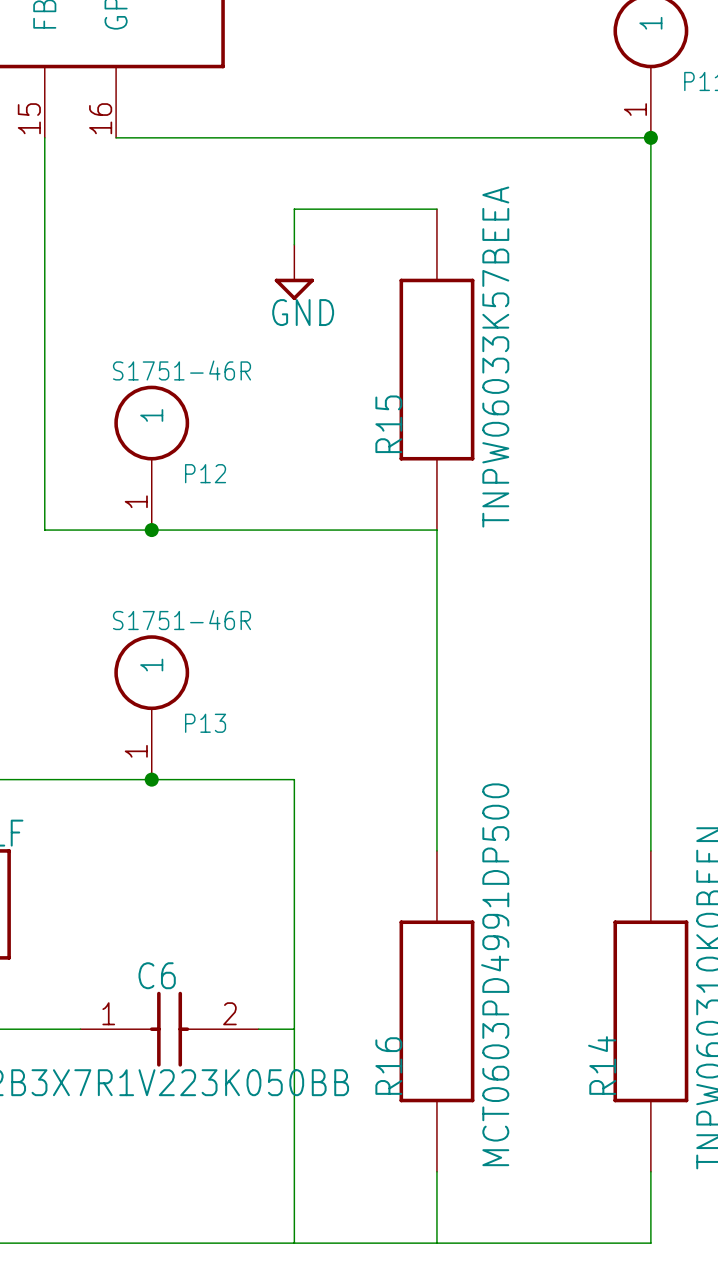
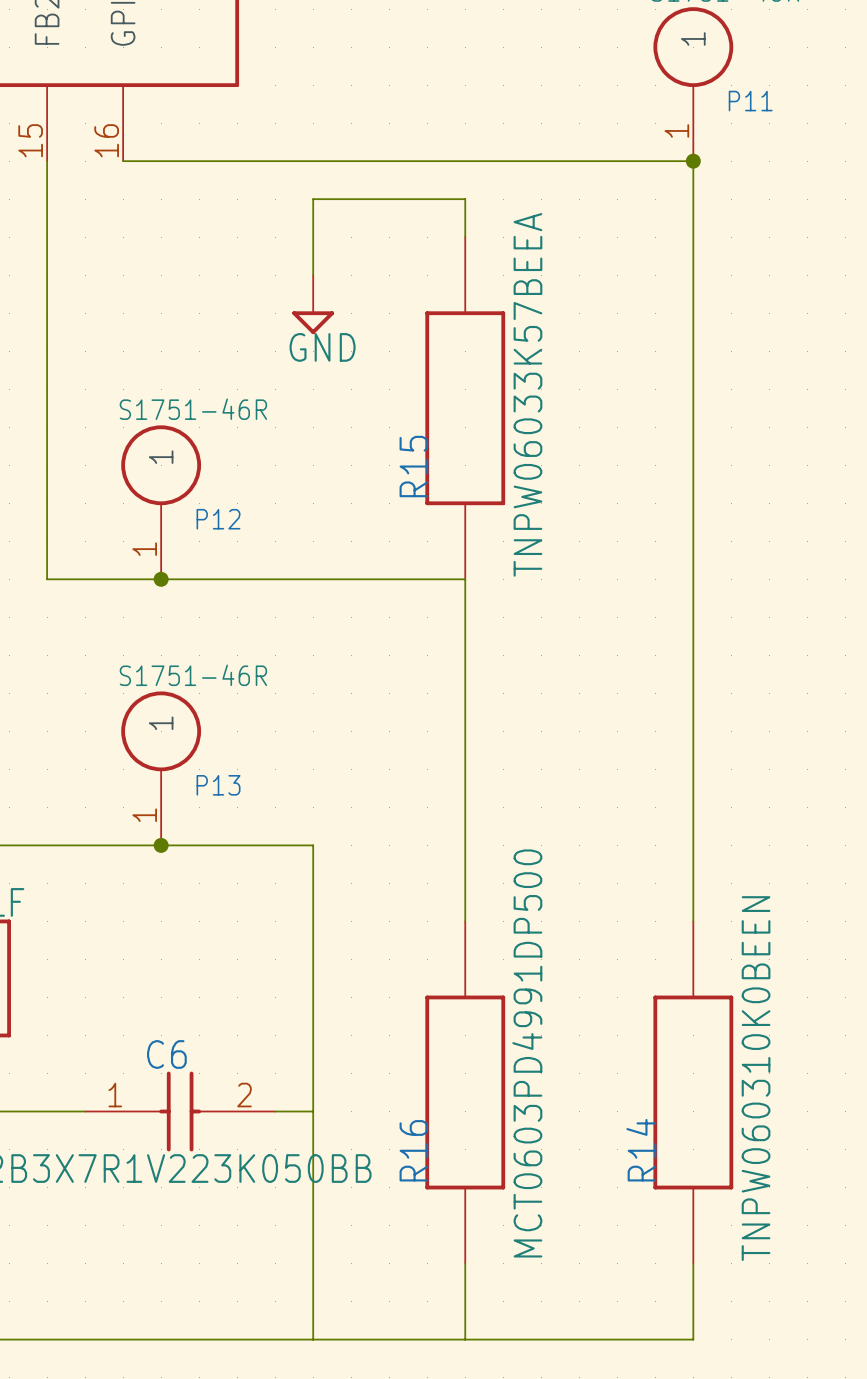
wire: (294, 209) (436, 209) -> (313, 237) (313, 199) (465, 199) (465, 237)

